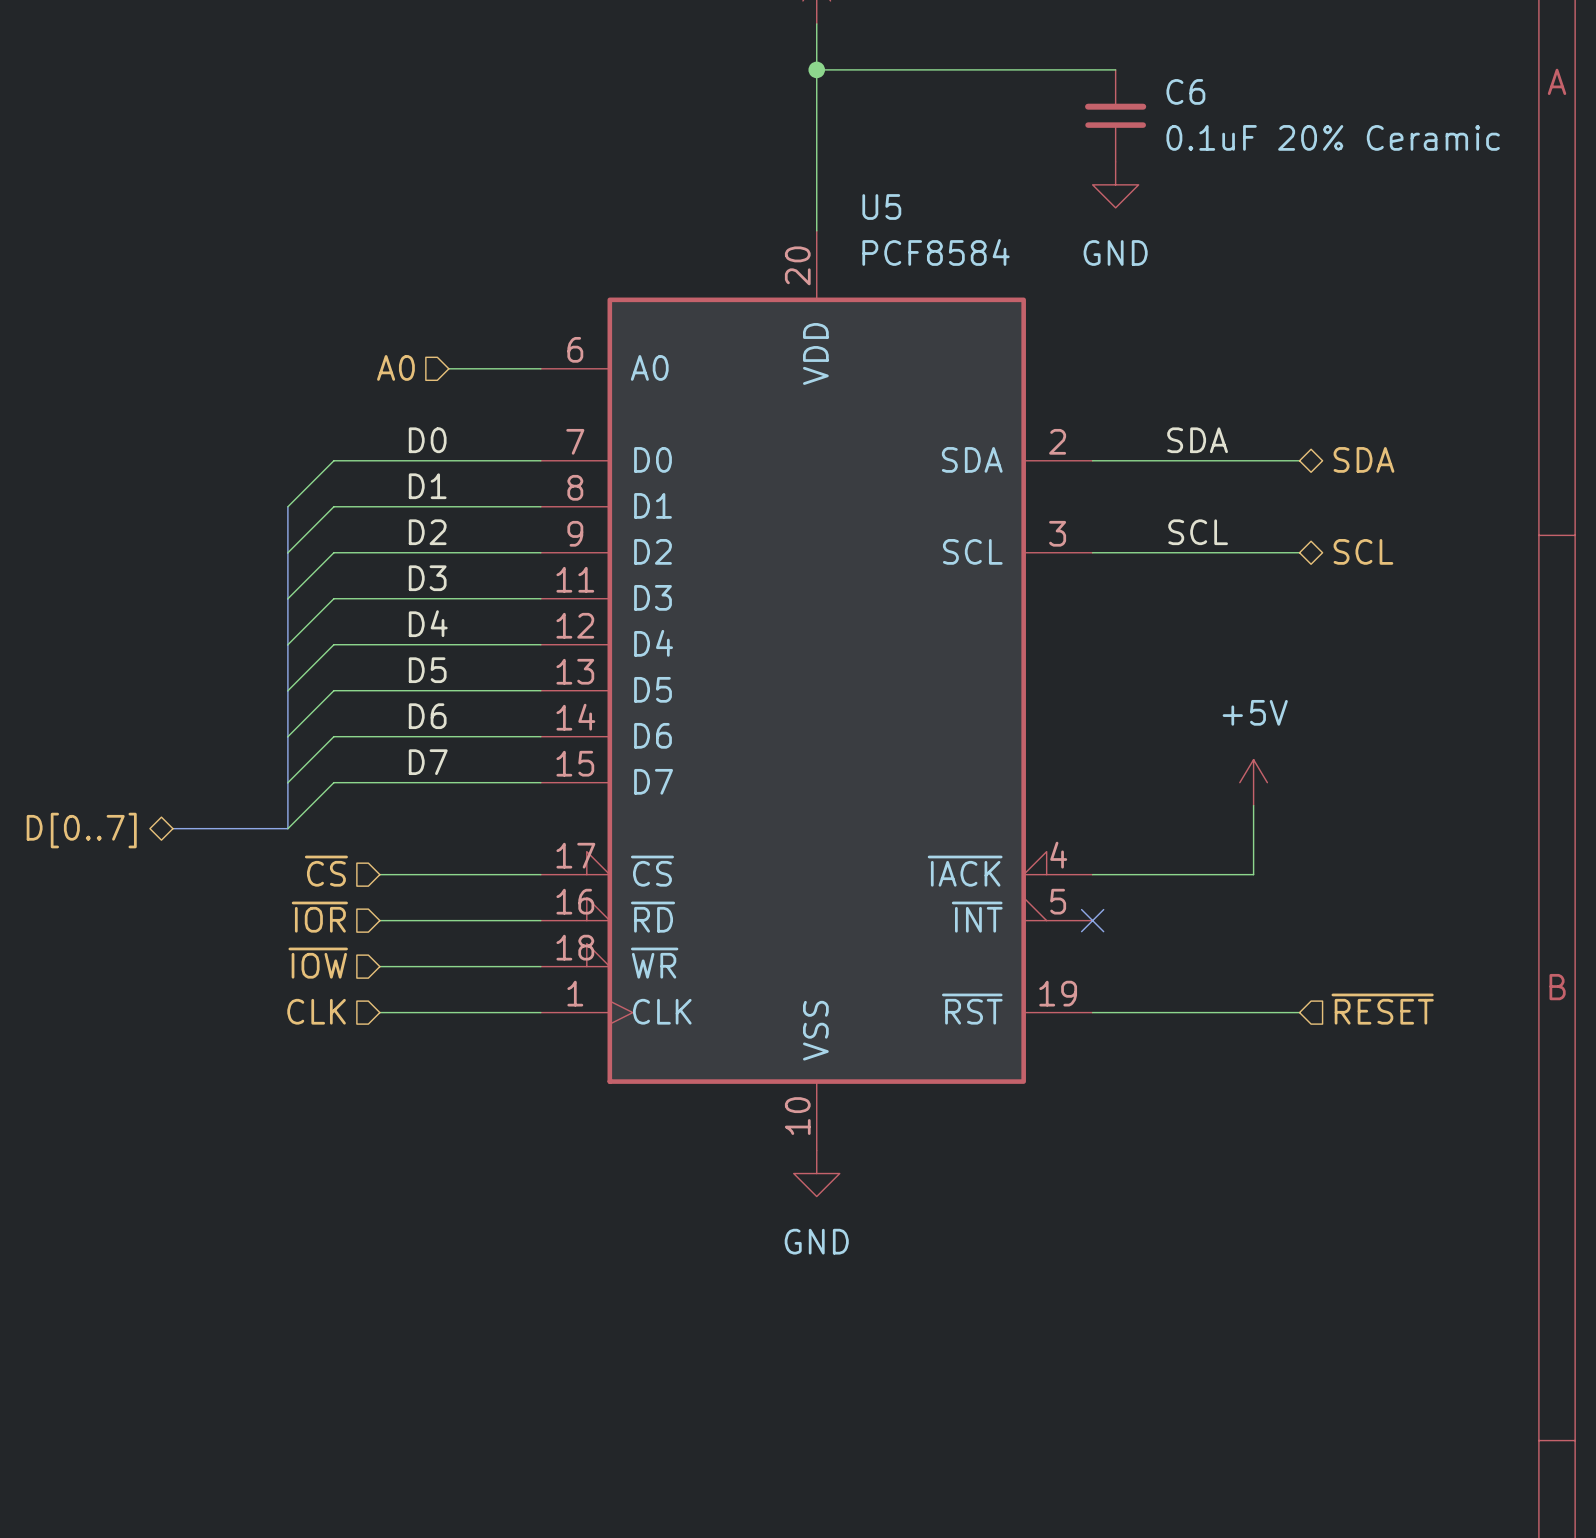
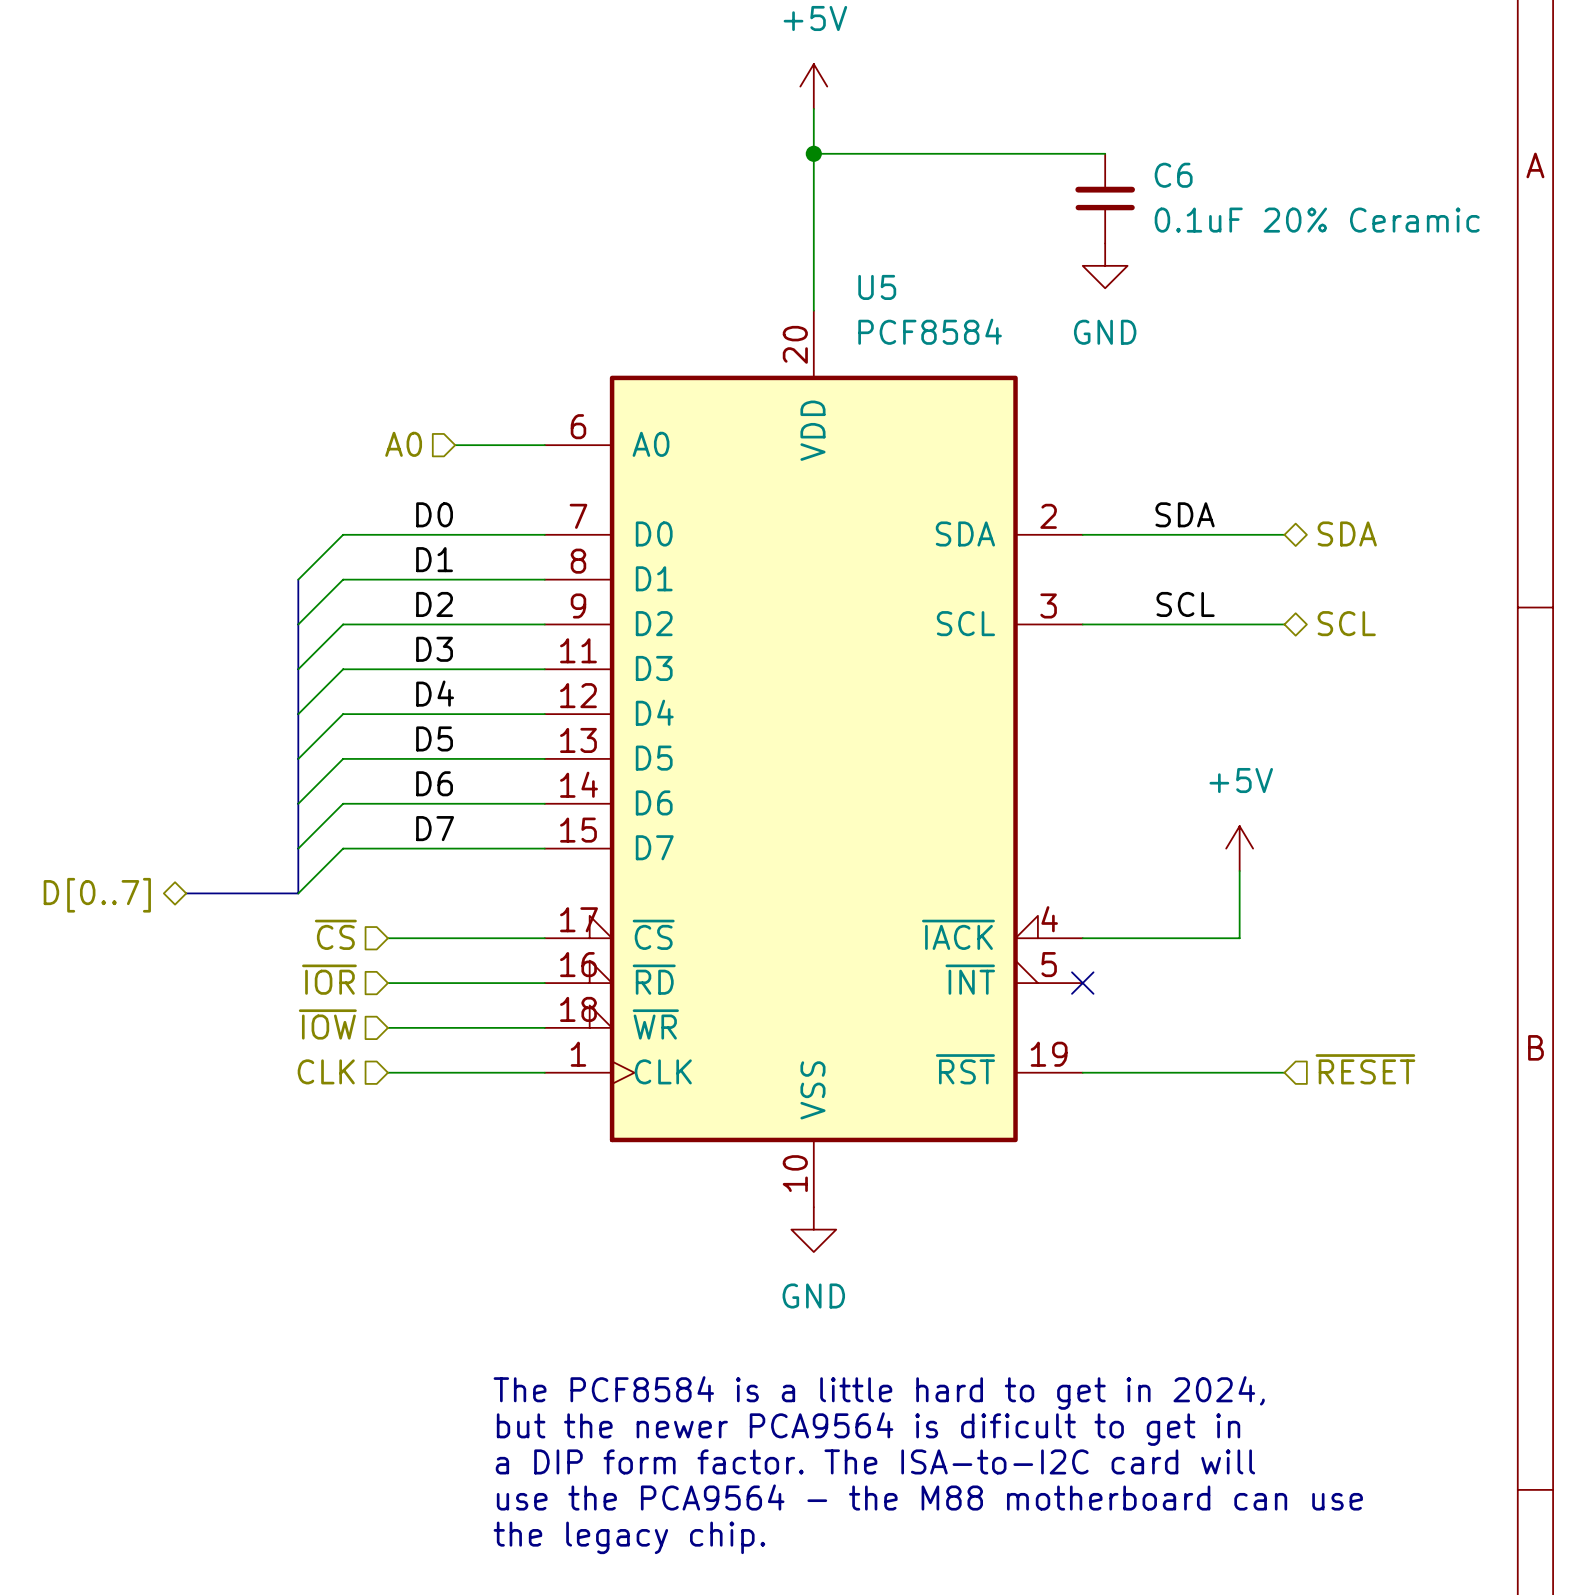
text: none -> The PCF8584 is a little hard to get in 2024, (879, 1392)
text: none -> but the newer PCA9564 is dificult to get in (868, 1429)
text: none -> a DIP form factor. The ISA-to-I2C card will (875, 1461)
text: none -> use the PCA9564 - the M88 motherboard can use (929, 1497)
text: none -> the legacy chip. (629, 1537)

